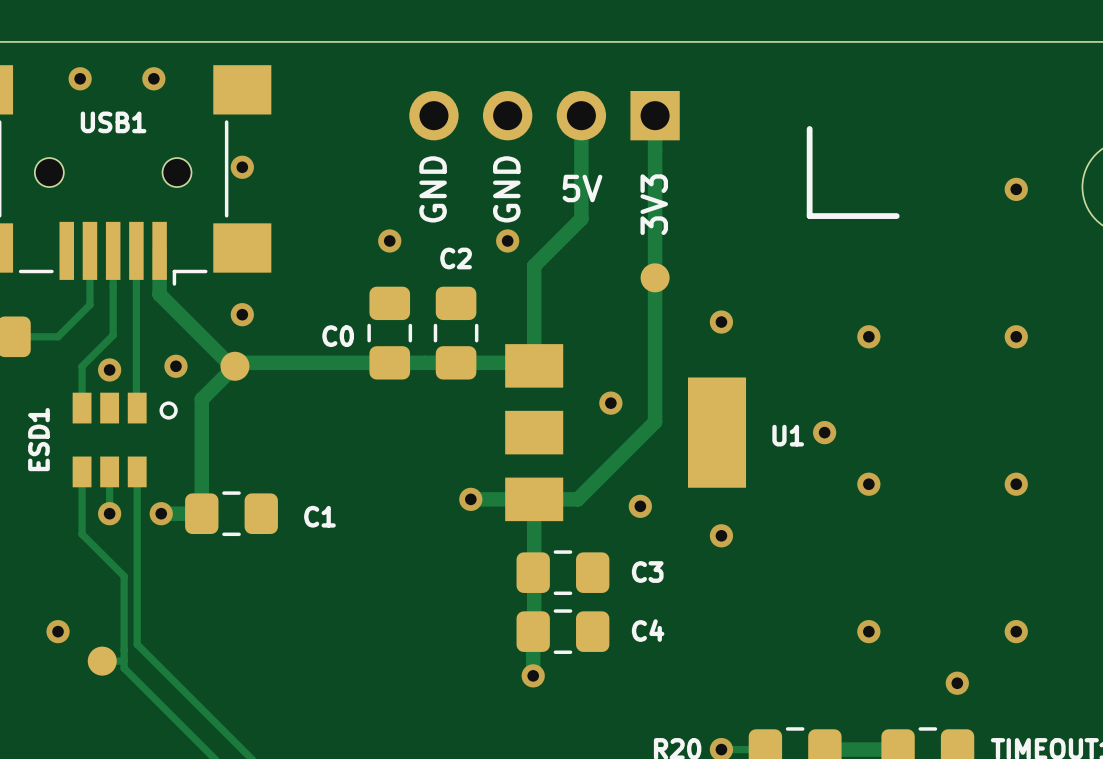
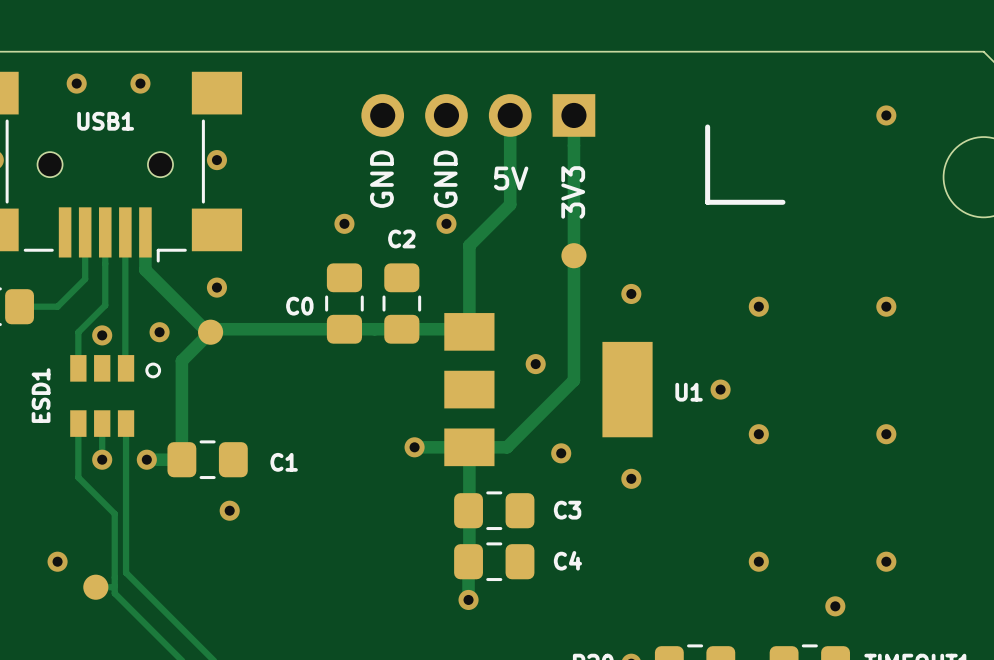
via position: (1016, 189) -> (886, 115)
via: none -> (229, 510)

